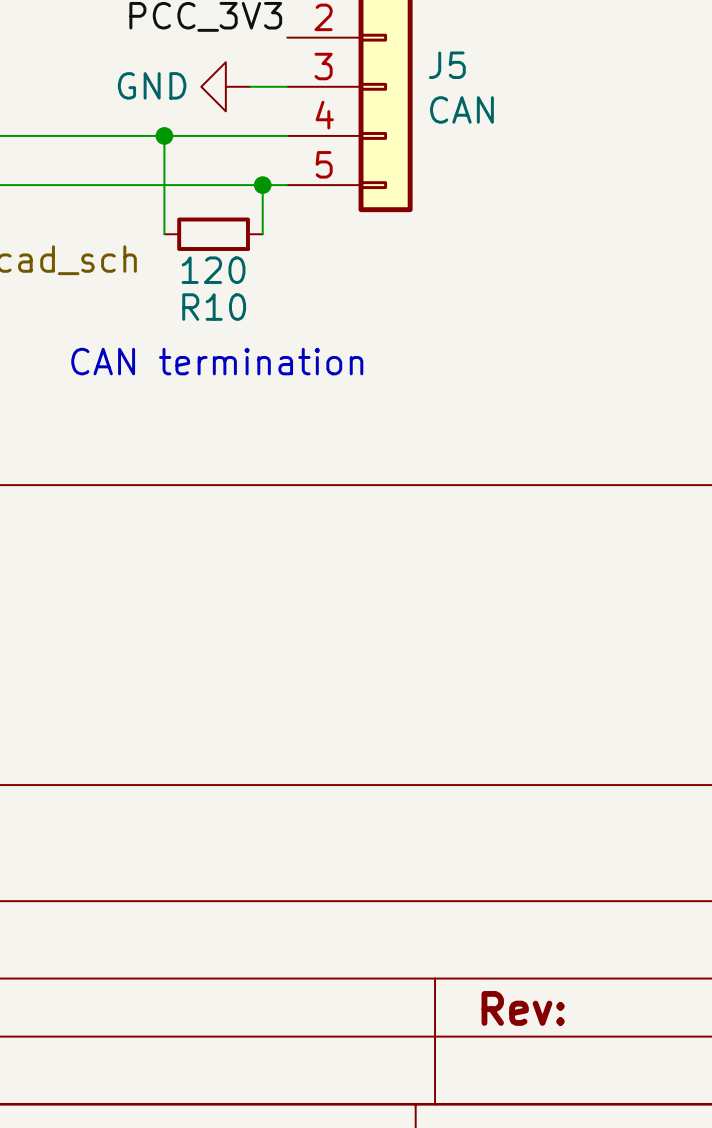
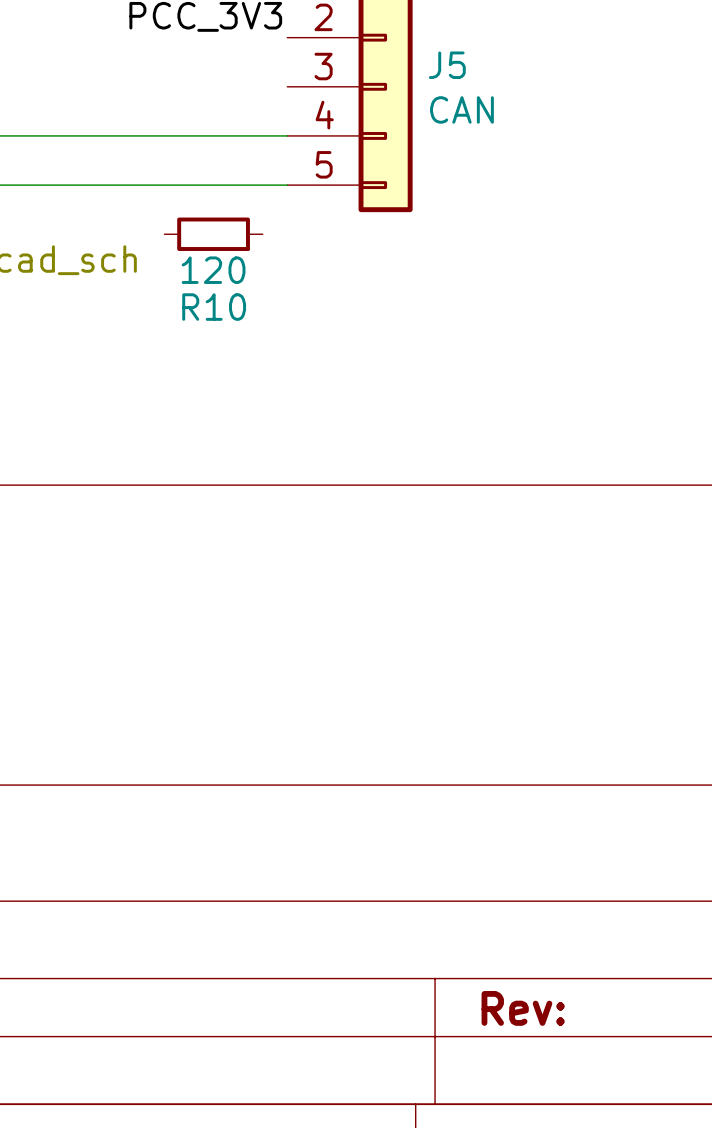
power symbol: GND (225, 86) -> none
wire: (250, 86) (287, 86) -> none
wire: (164, 135) (164, 234) -> none
junction: (164, 135) -> none
wire: (262, 185) (262, 234) -> none
junction: (262, 185) -> none
text: CAN termination (217, 361) -> none

